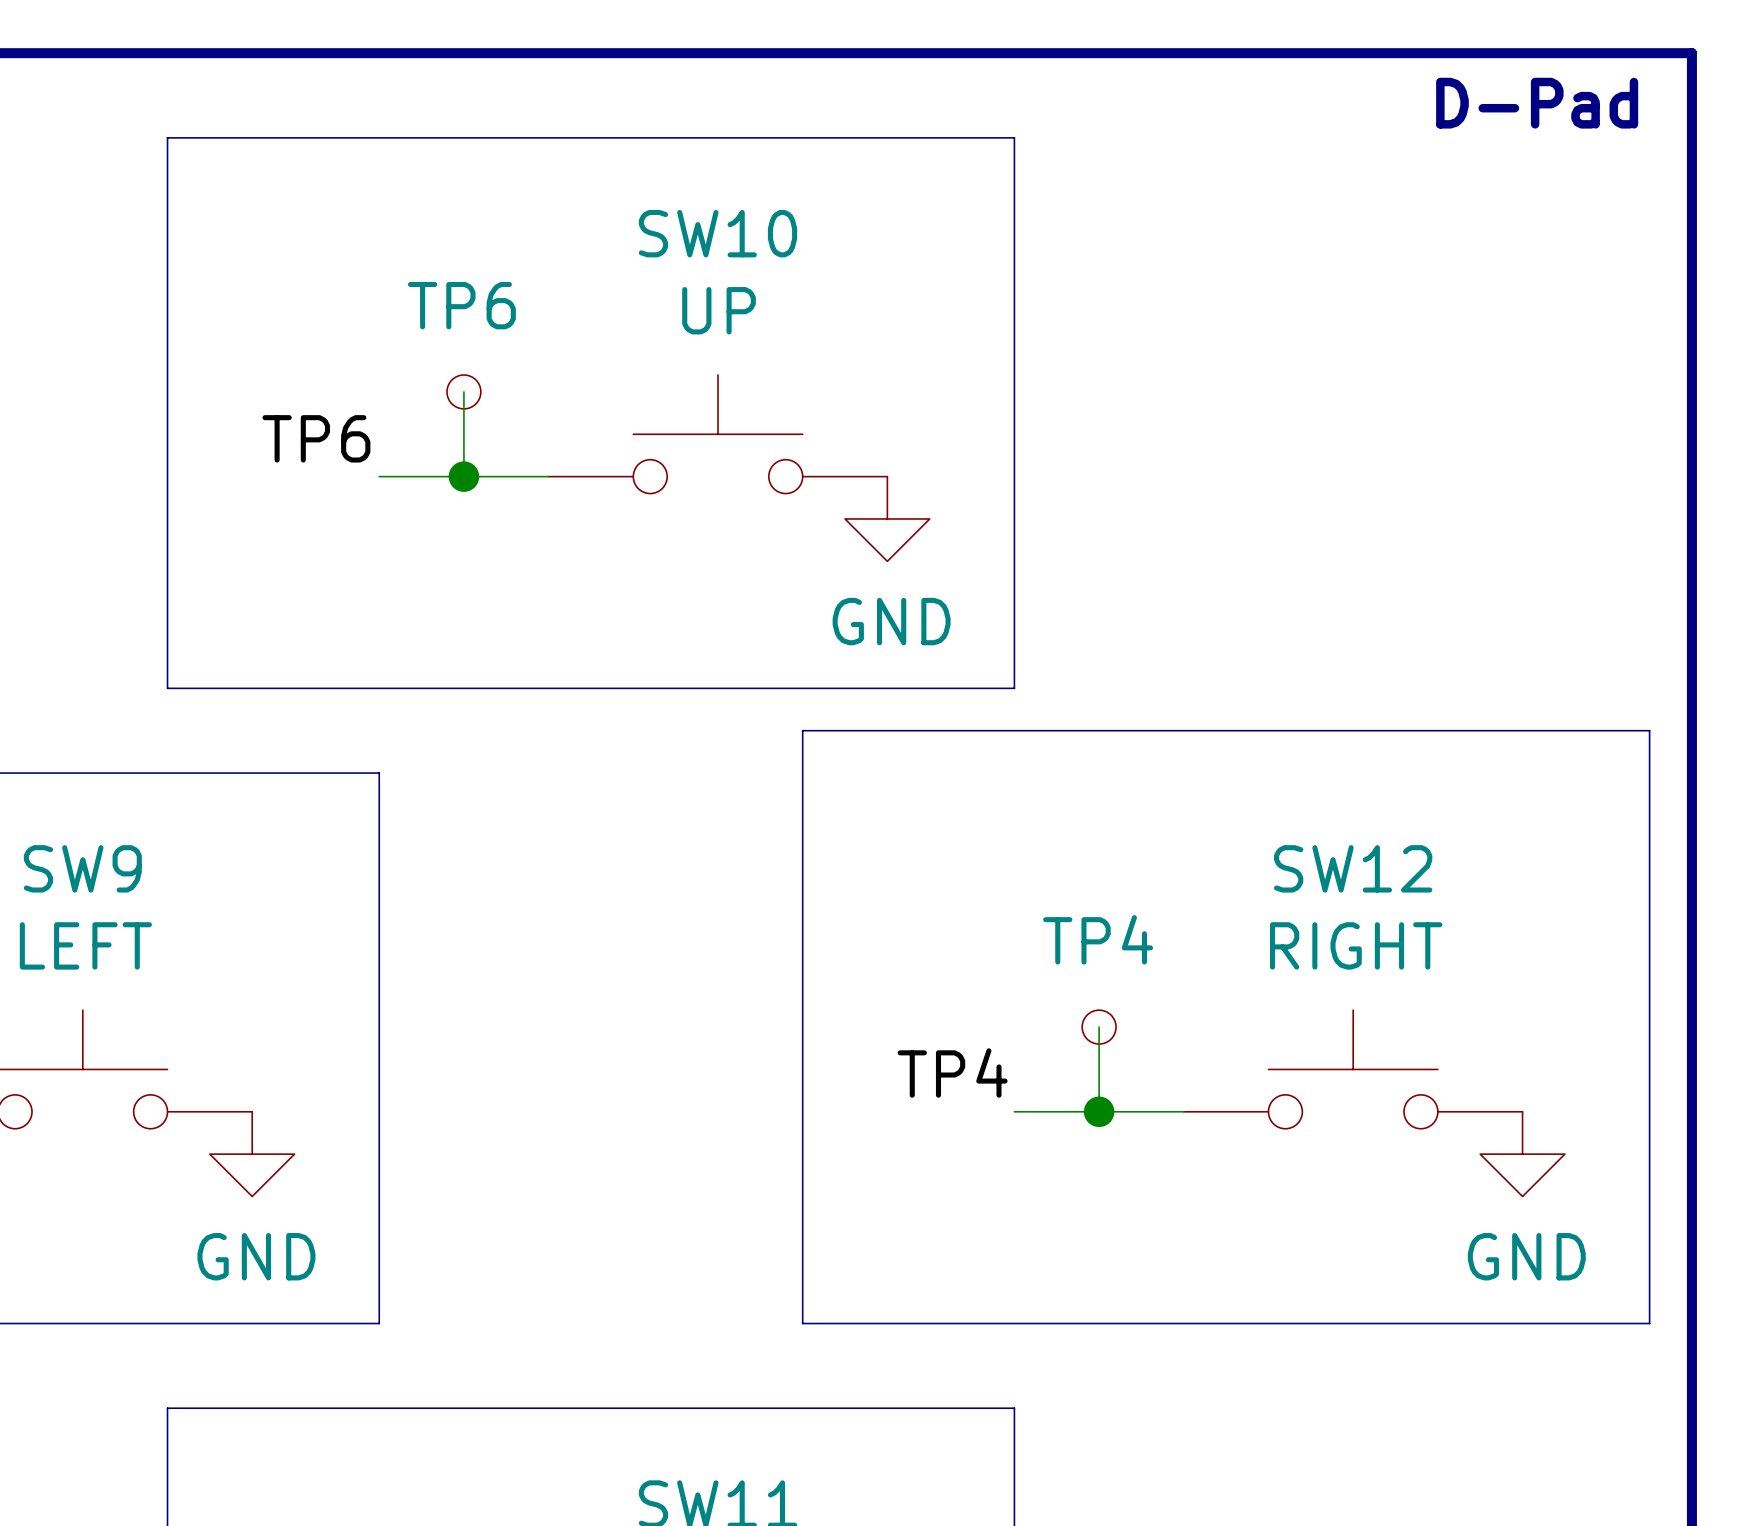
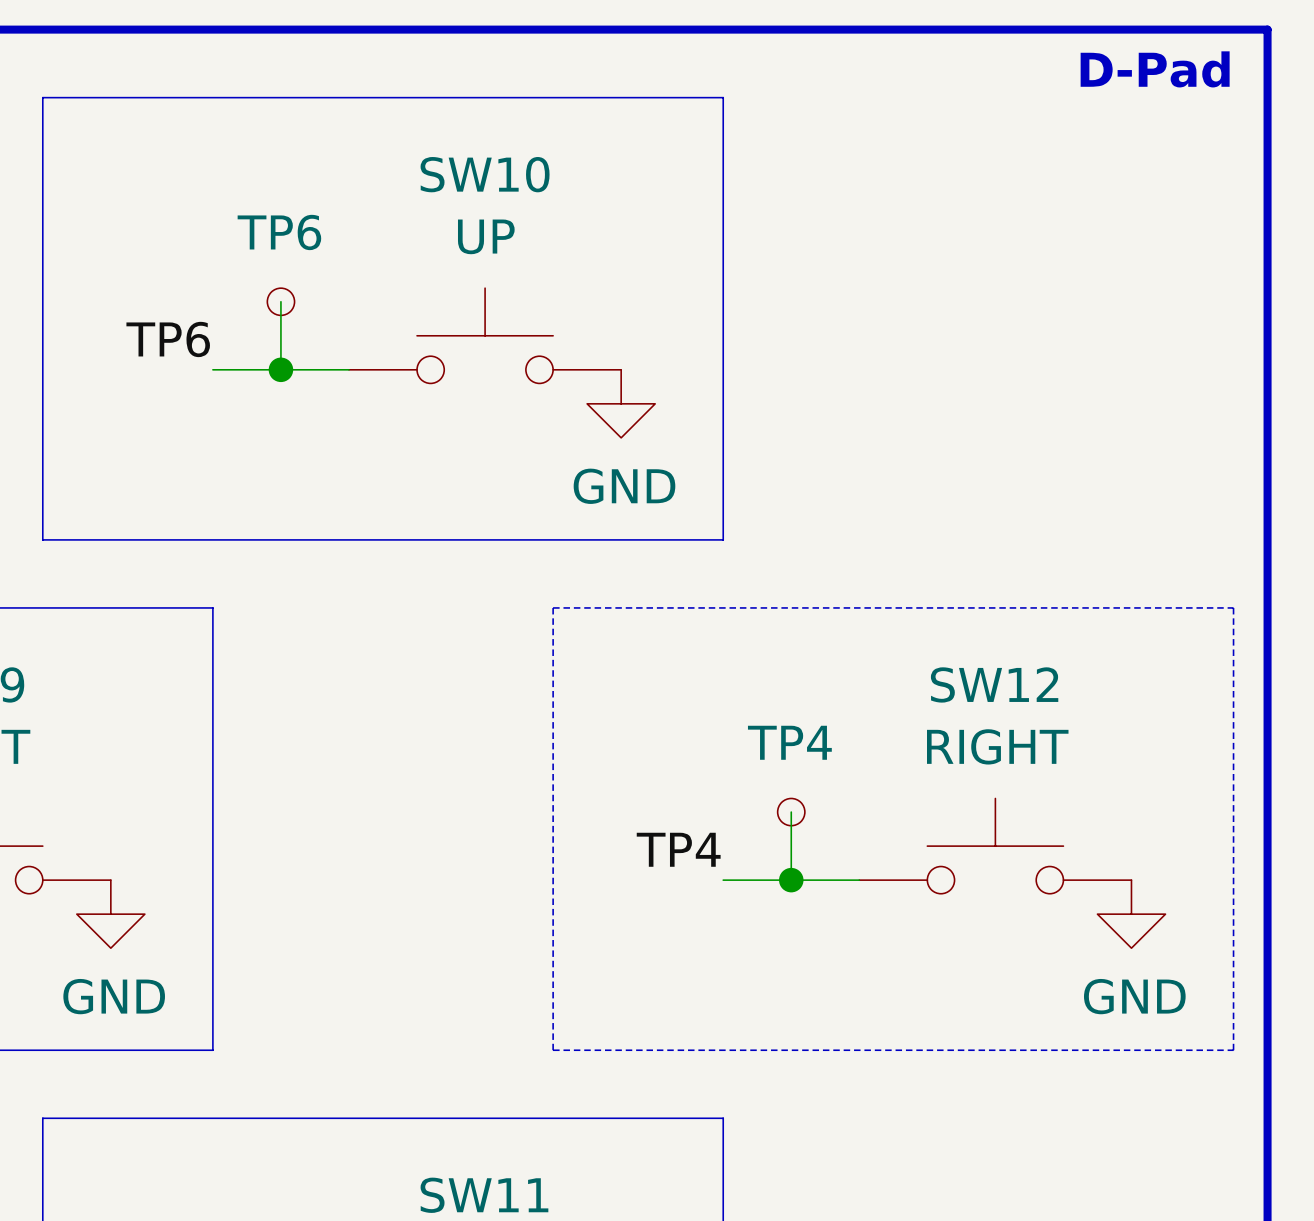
line: (802, 730) (802, 1323) (1649, 1323) (1649, 730) (802, 730) -> (553, 607) (553, 1050) (1233, 1050) (1233, 607) (553, 607)

